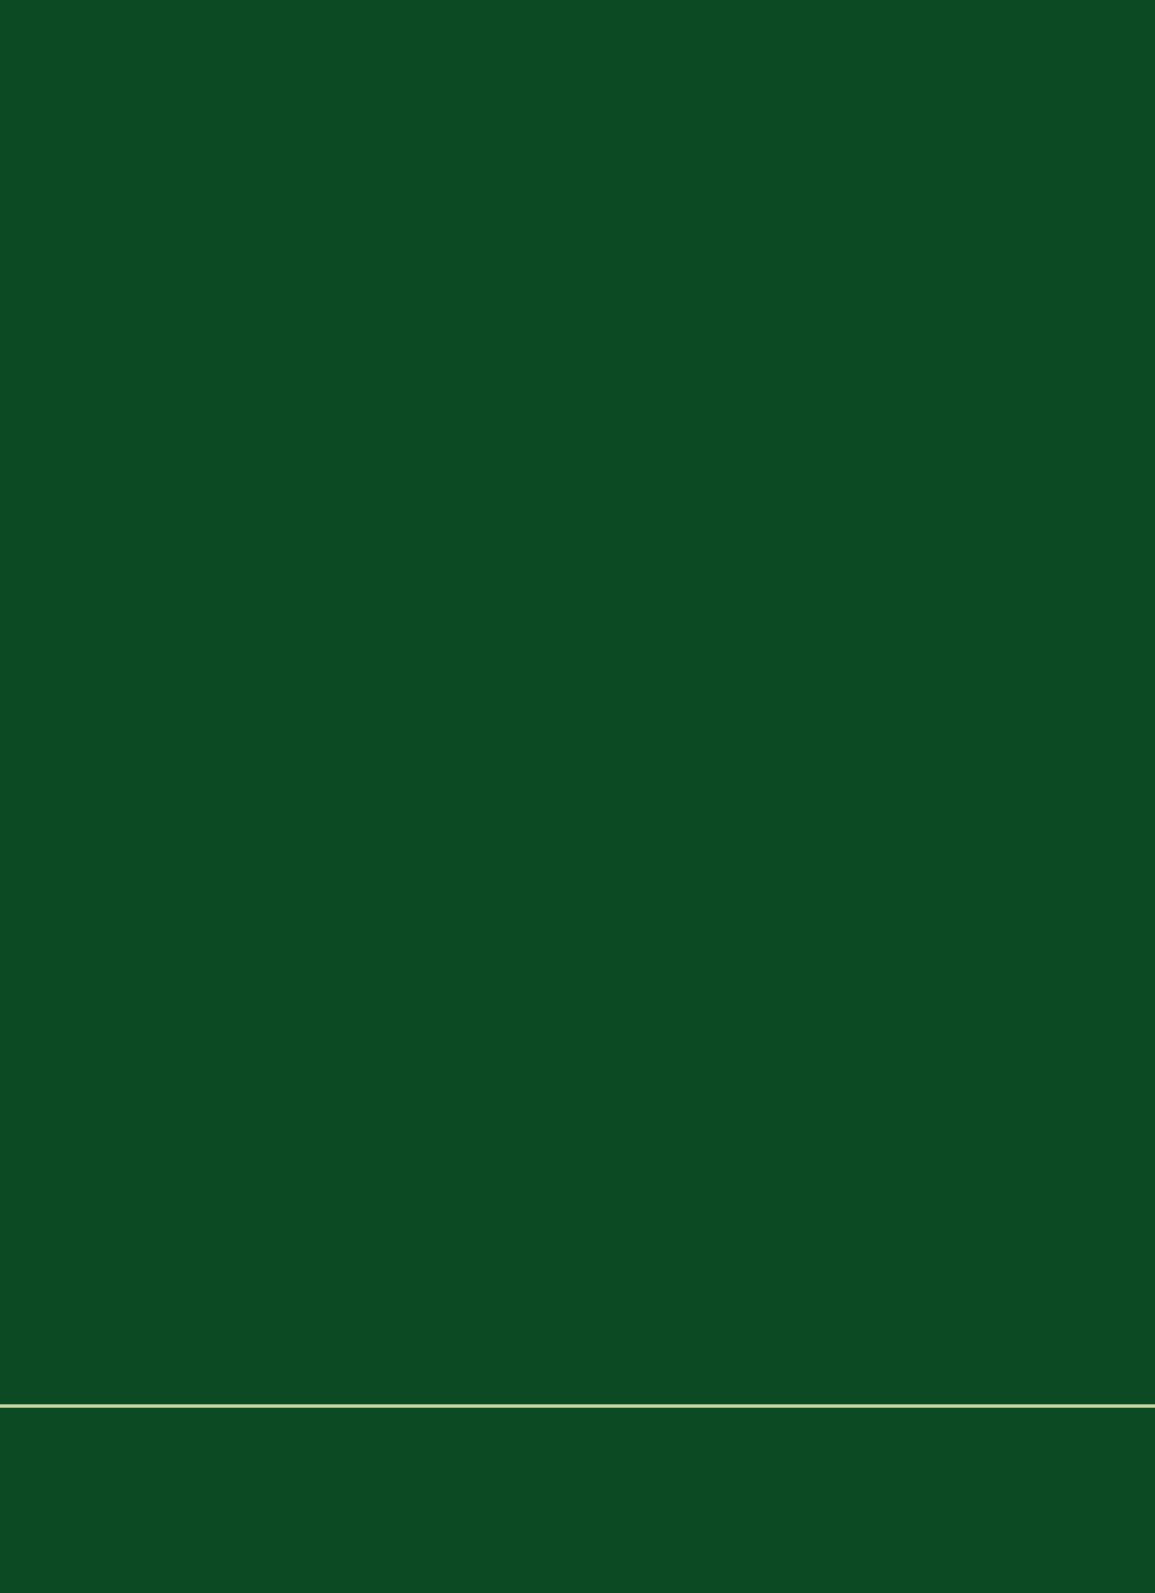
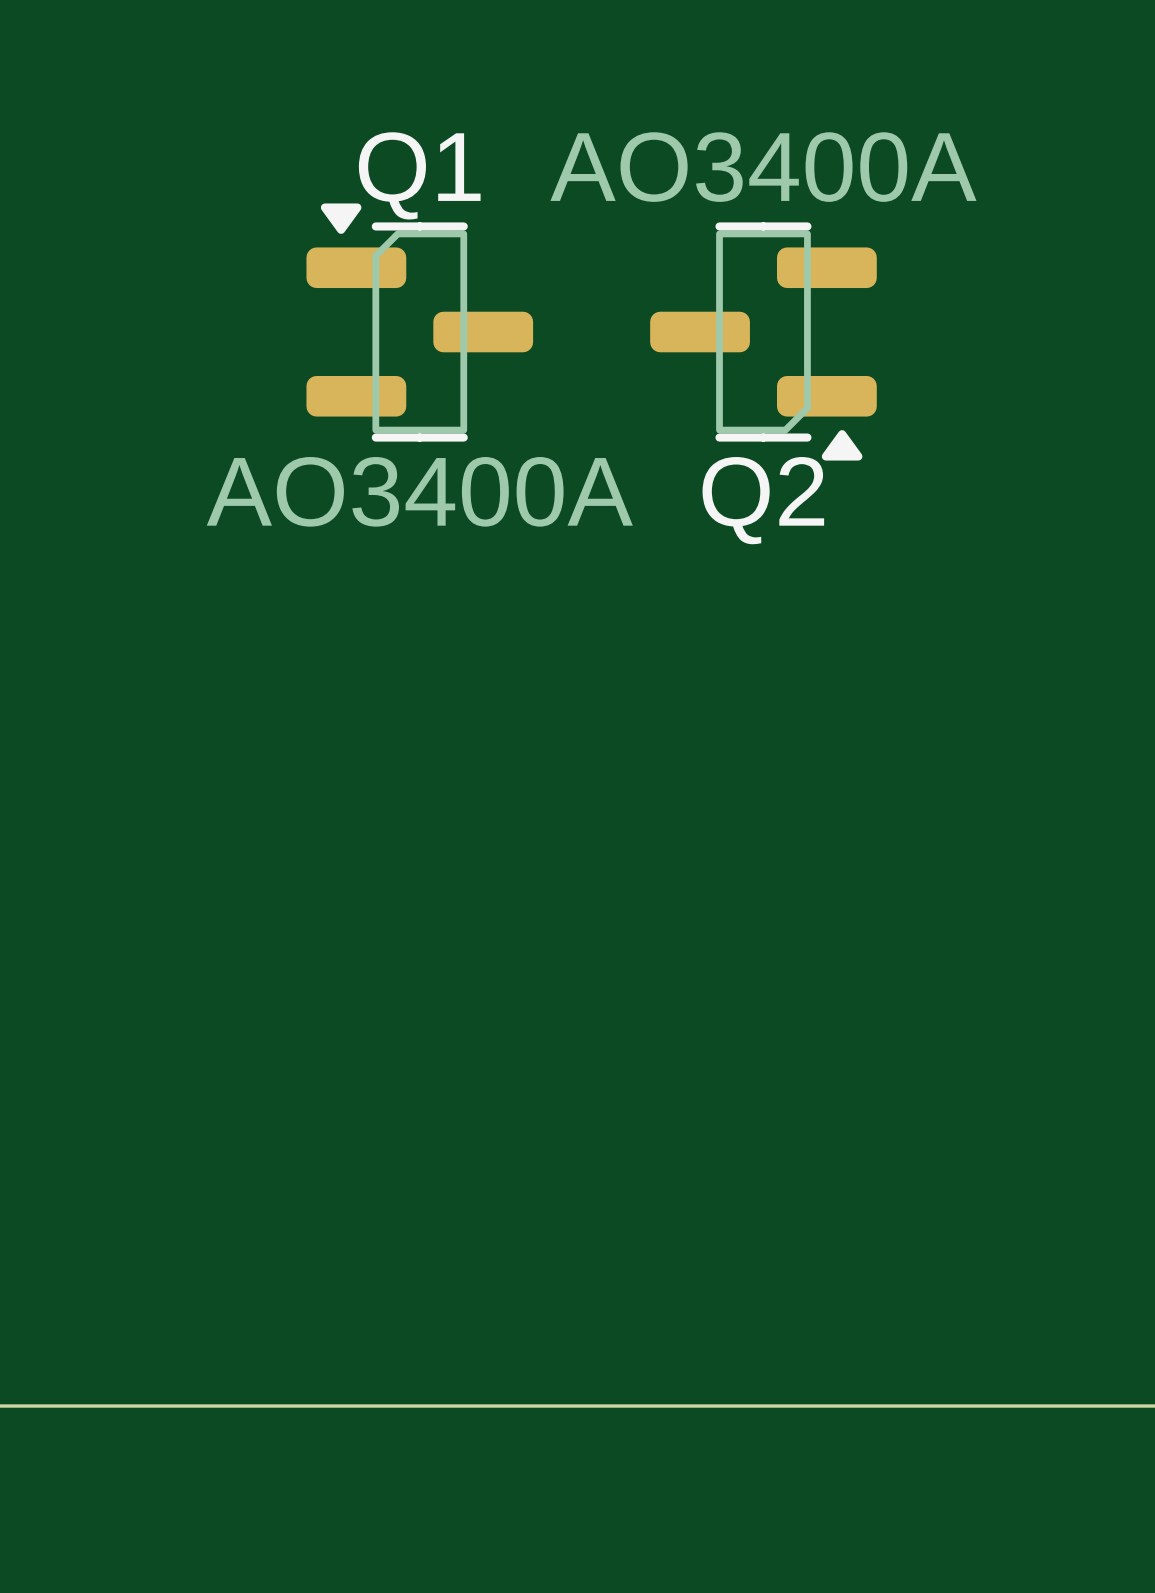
Q1: none -> AO3400A (419, 322)
Q2: none -> AO3400A (763, 341)

